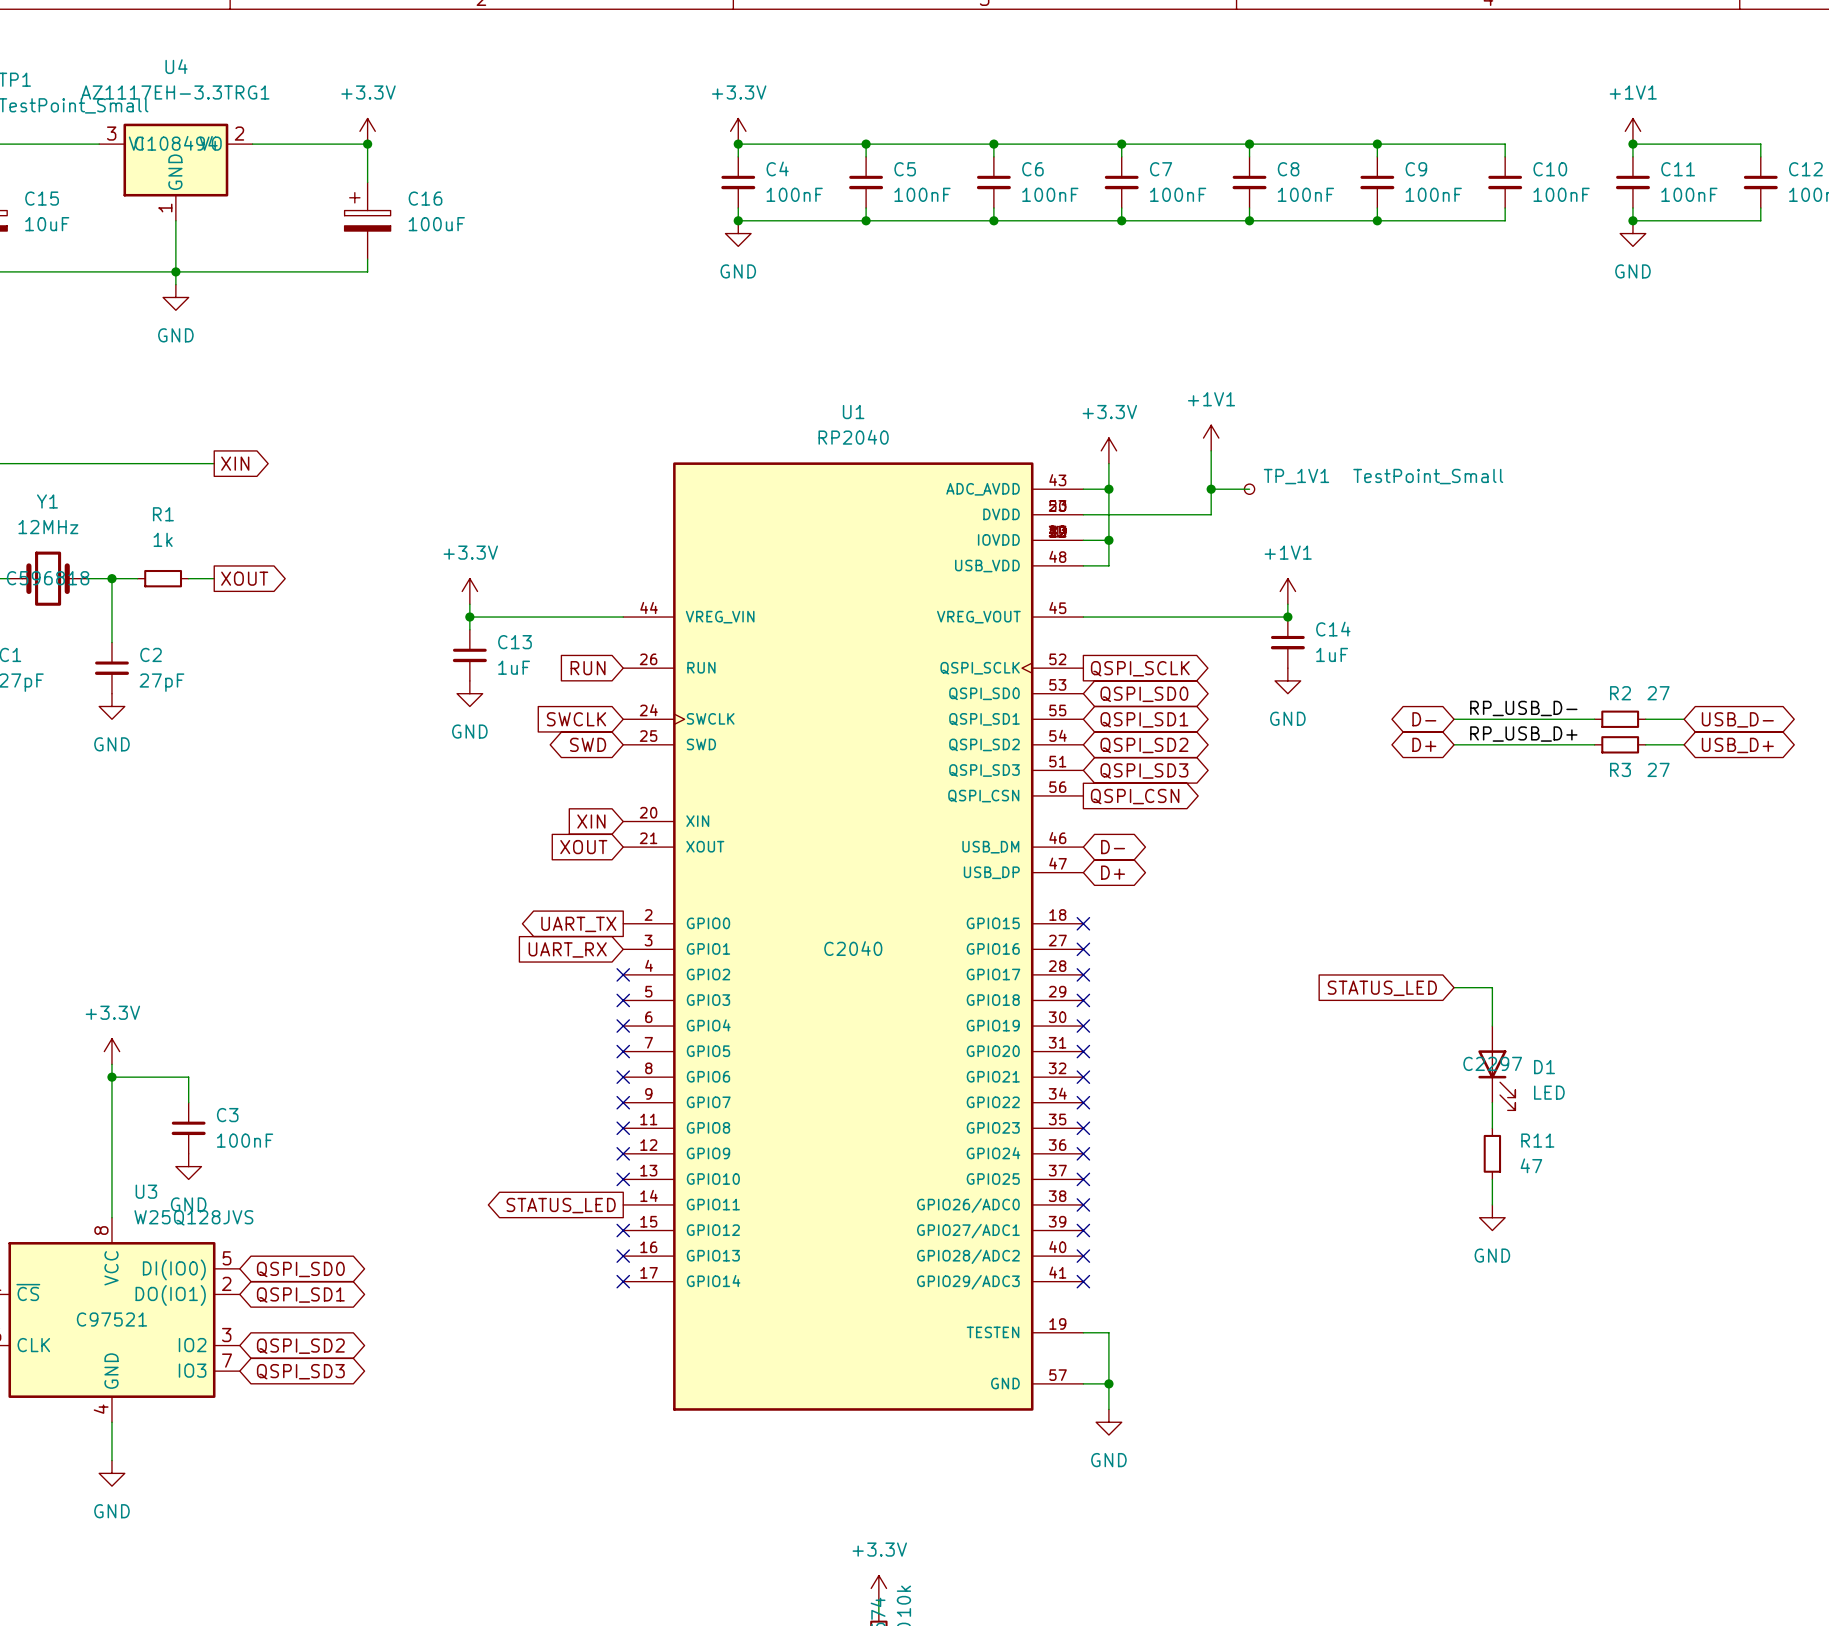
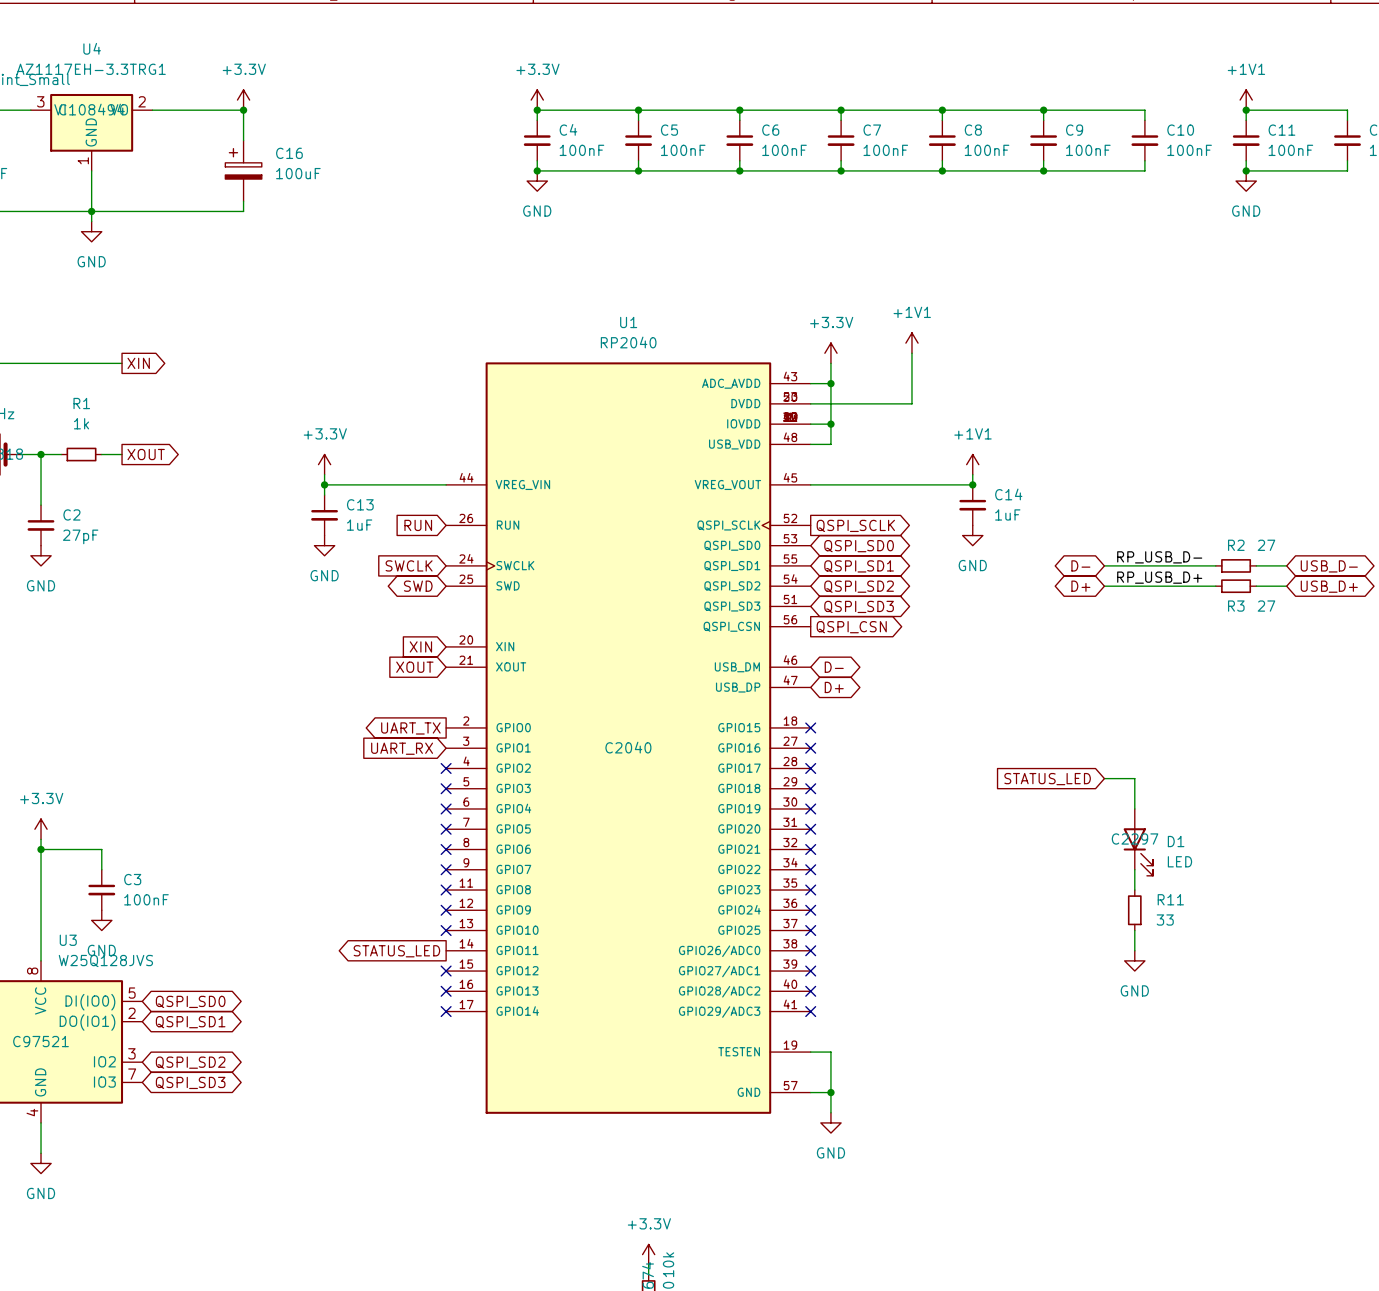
wire: (1211, 489) (1249, 489) -> none
junction: (1211, 489) -> none
TP_1V1: TestPoint_Small (1249, 489) -> none
R11 value: 47 (1531, 1165) -> 33 (1165, 920)

